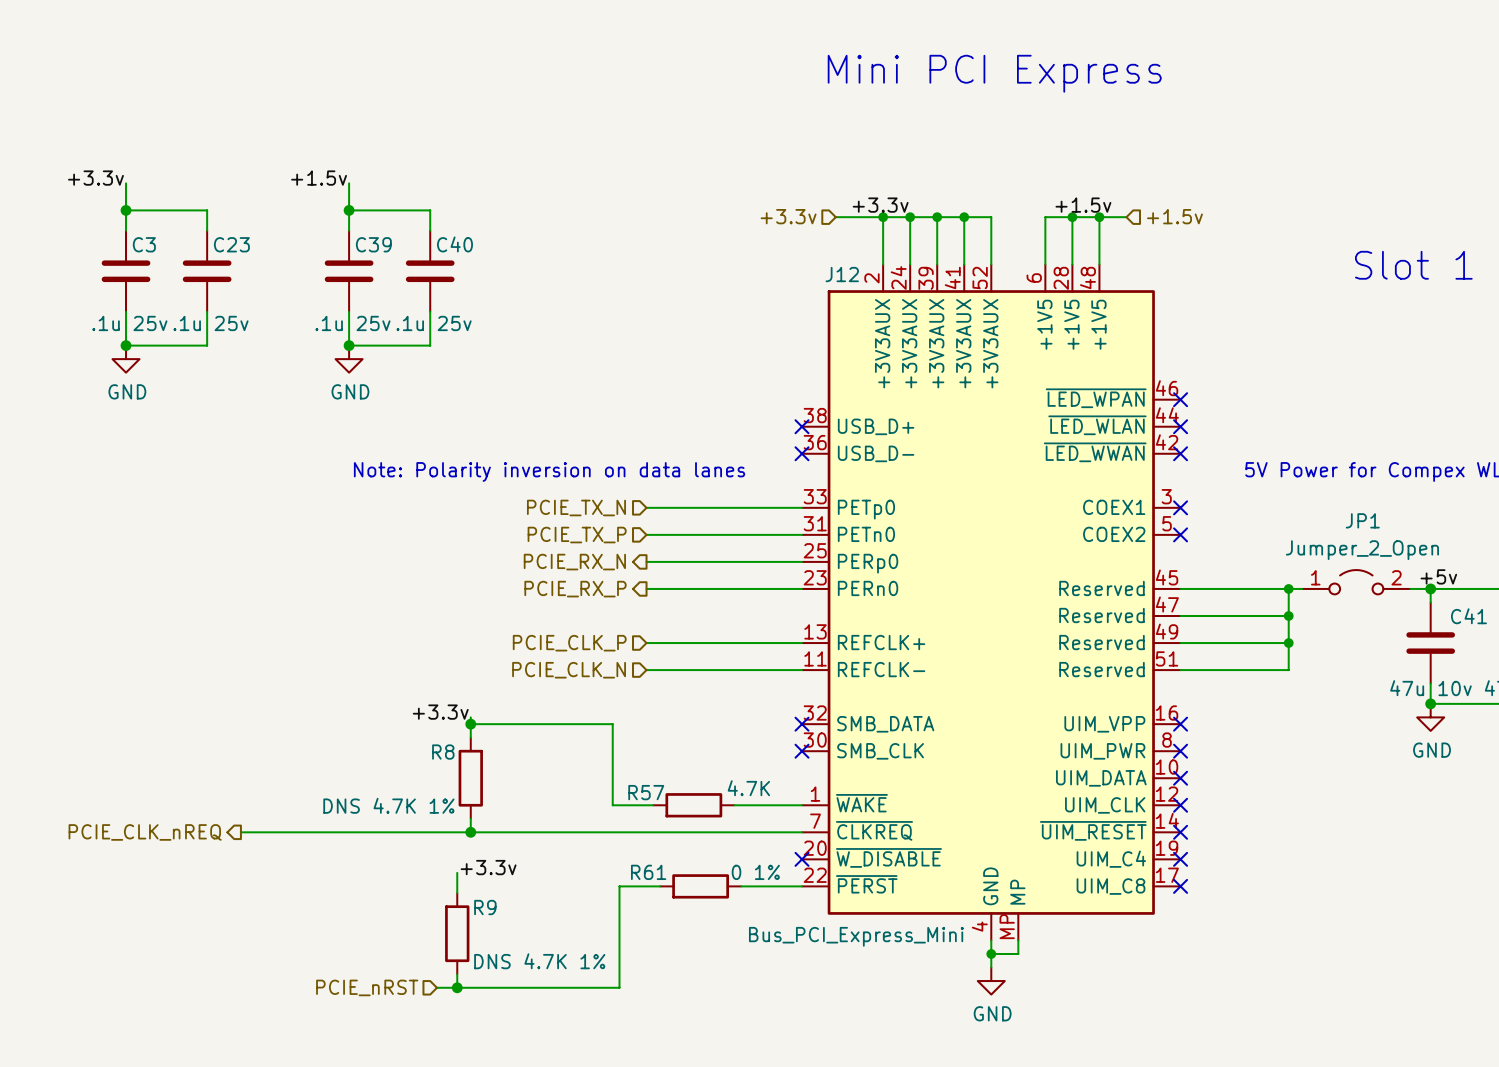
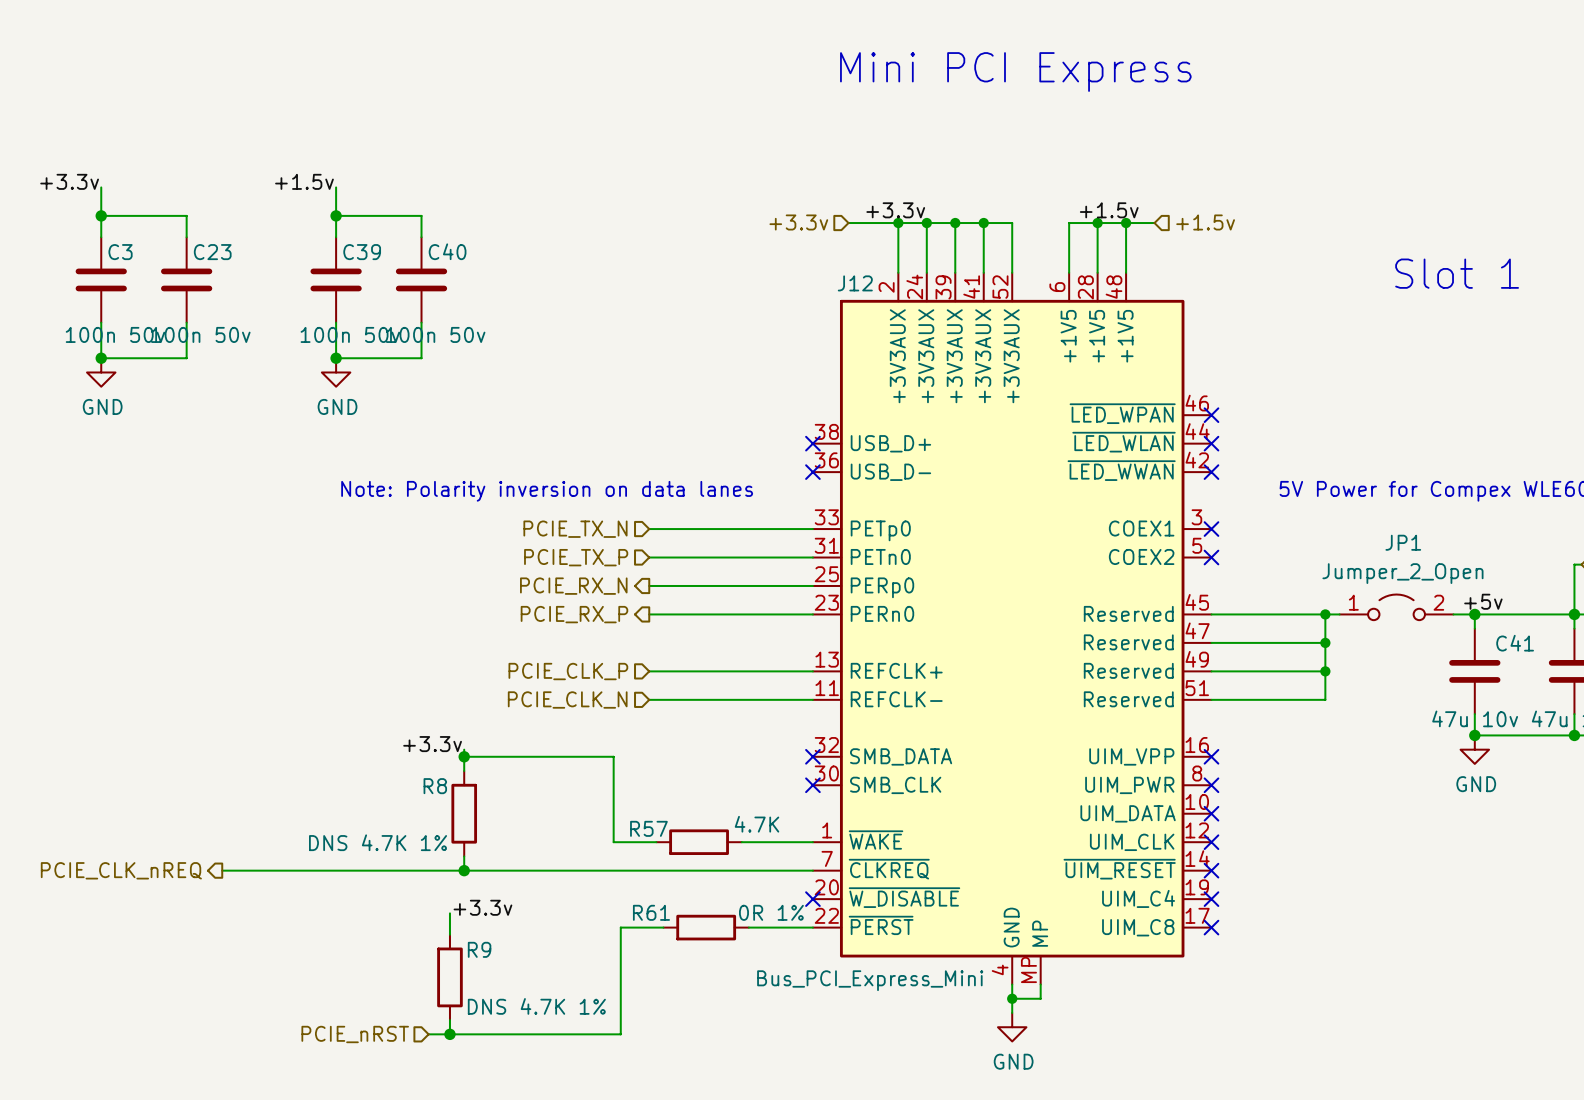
C3 value: .1u 25v (129, 323) -> 100n 50v (115, 334)
C23 value: .1u 25v (210, 323) -> 100n 50v (200, 334)
C39 value: .1u 25v (352, 323) -> 100n 50v (350, 334)
C40 value: .1u 25v (434, 323) -> 100n 50v (435, 334)
R61 value: 0 1% (755, 872) -> 0R 1% (771, 912)

